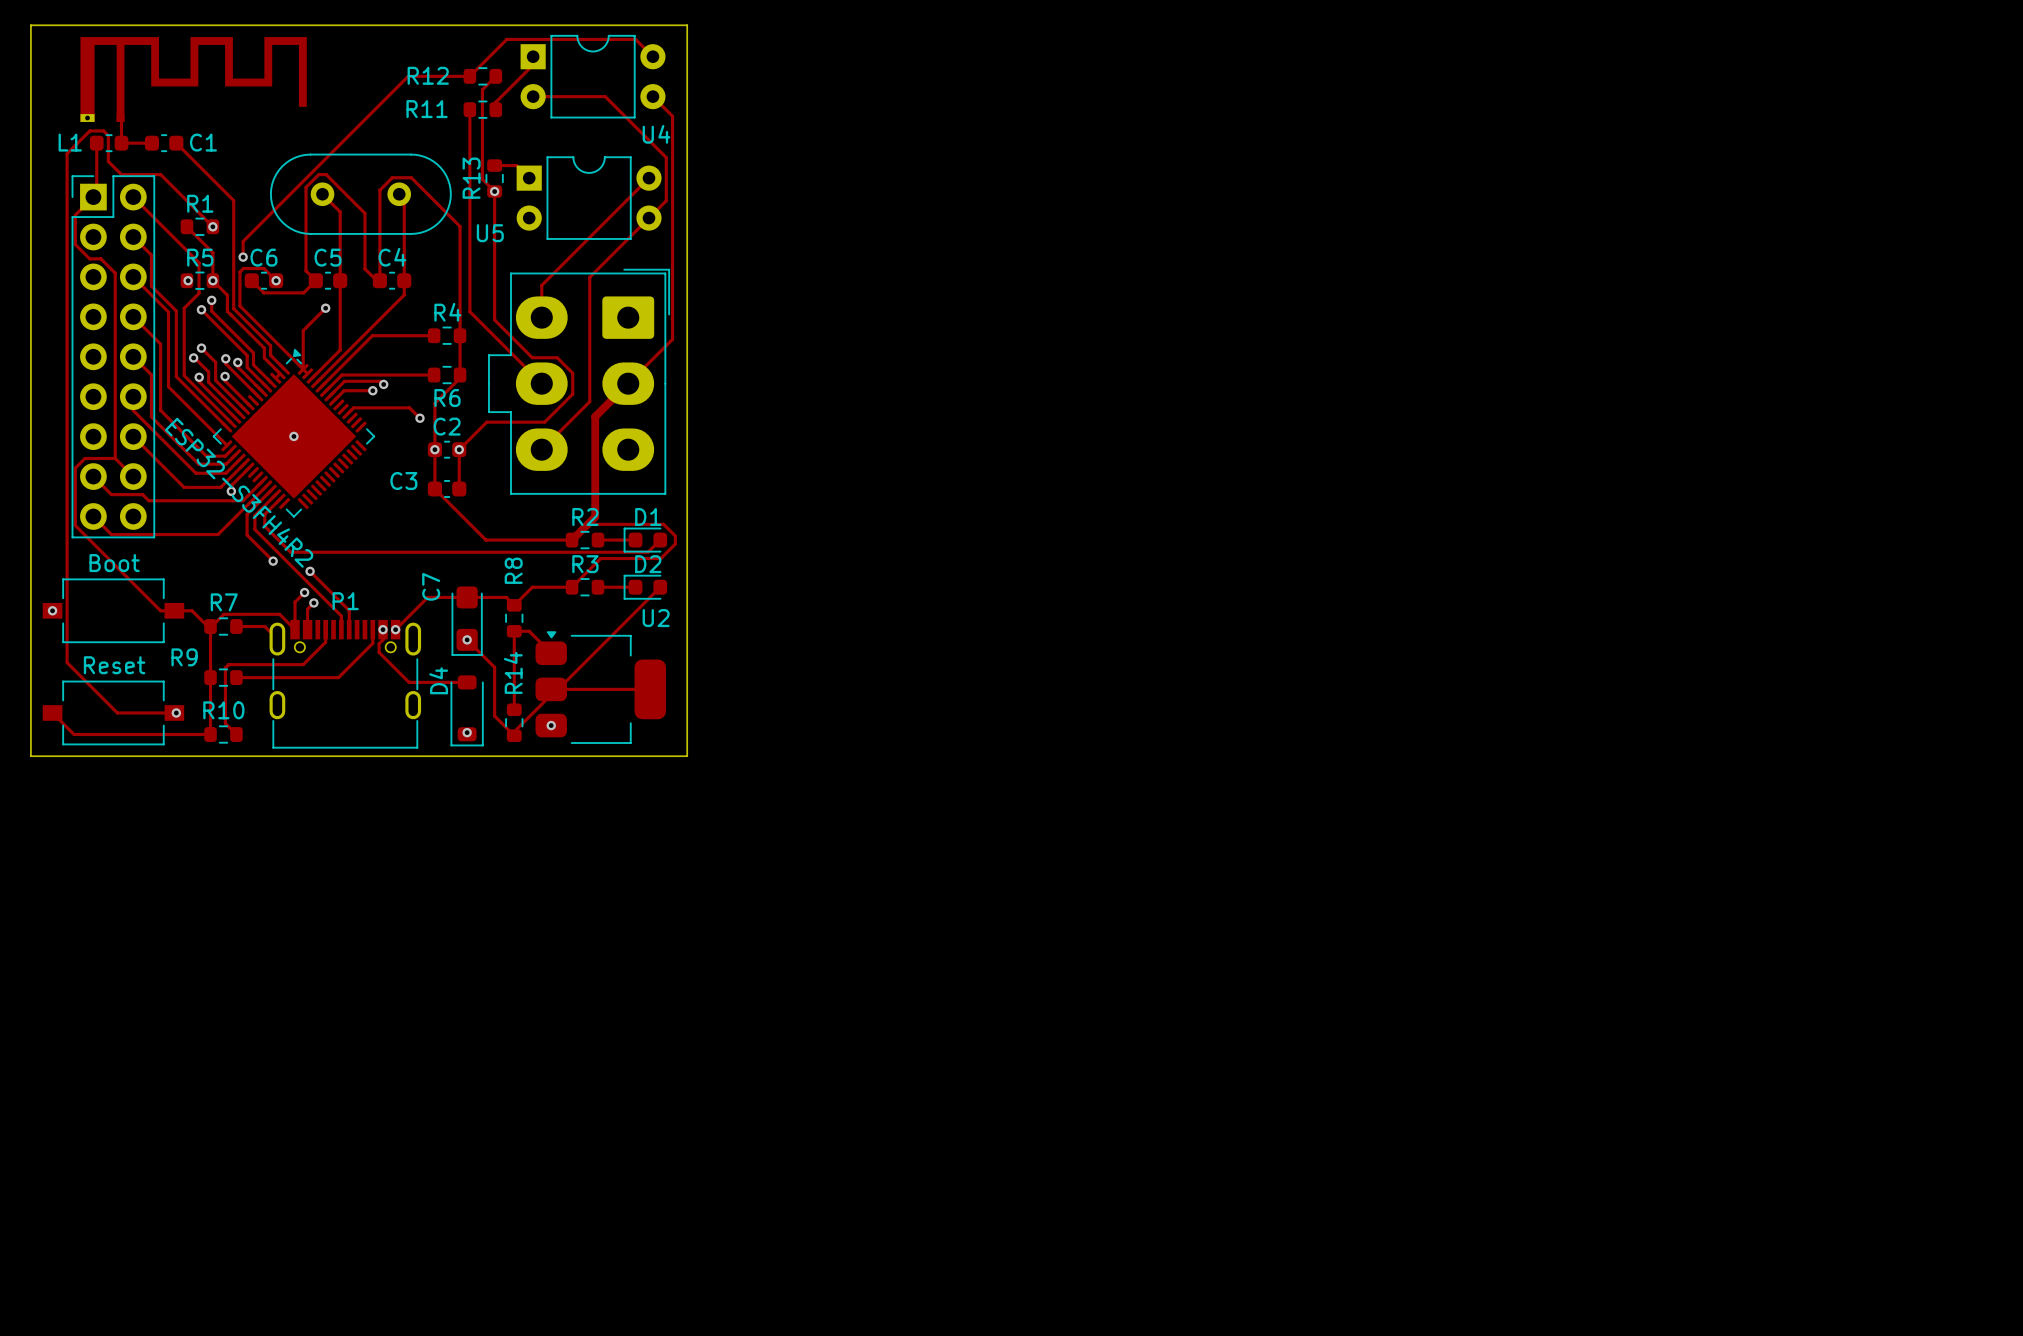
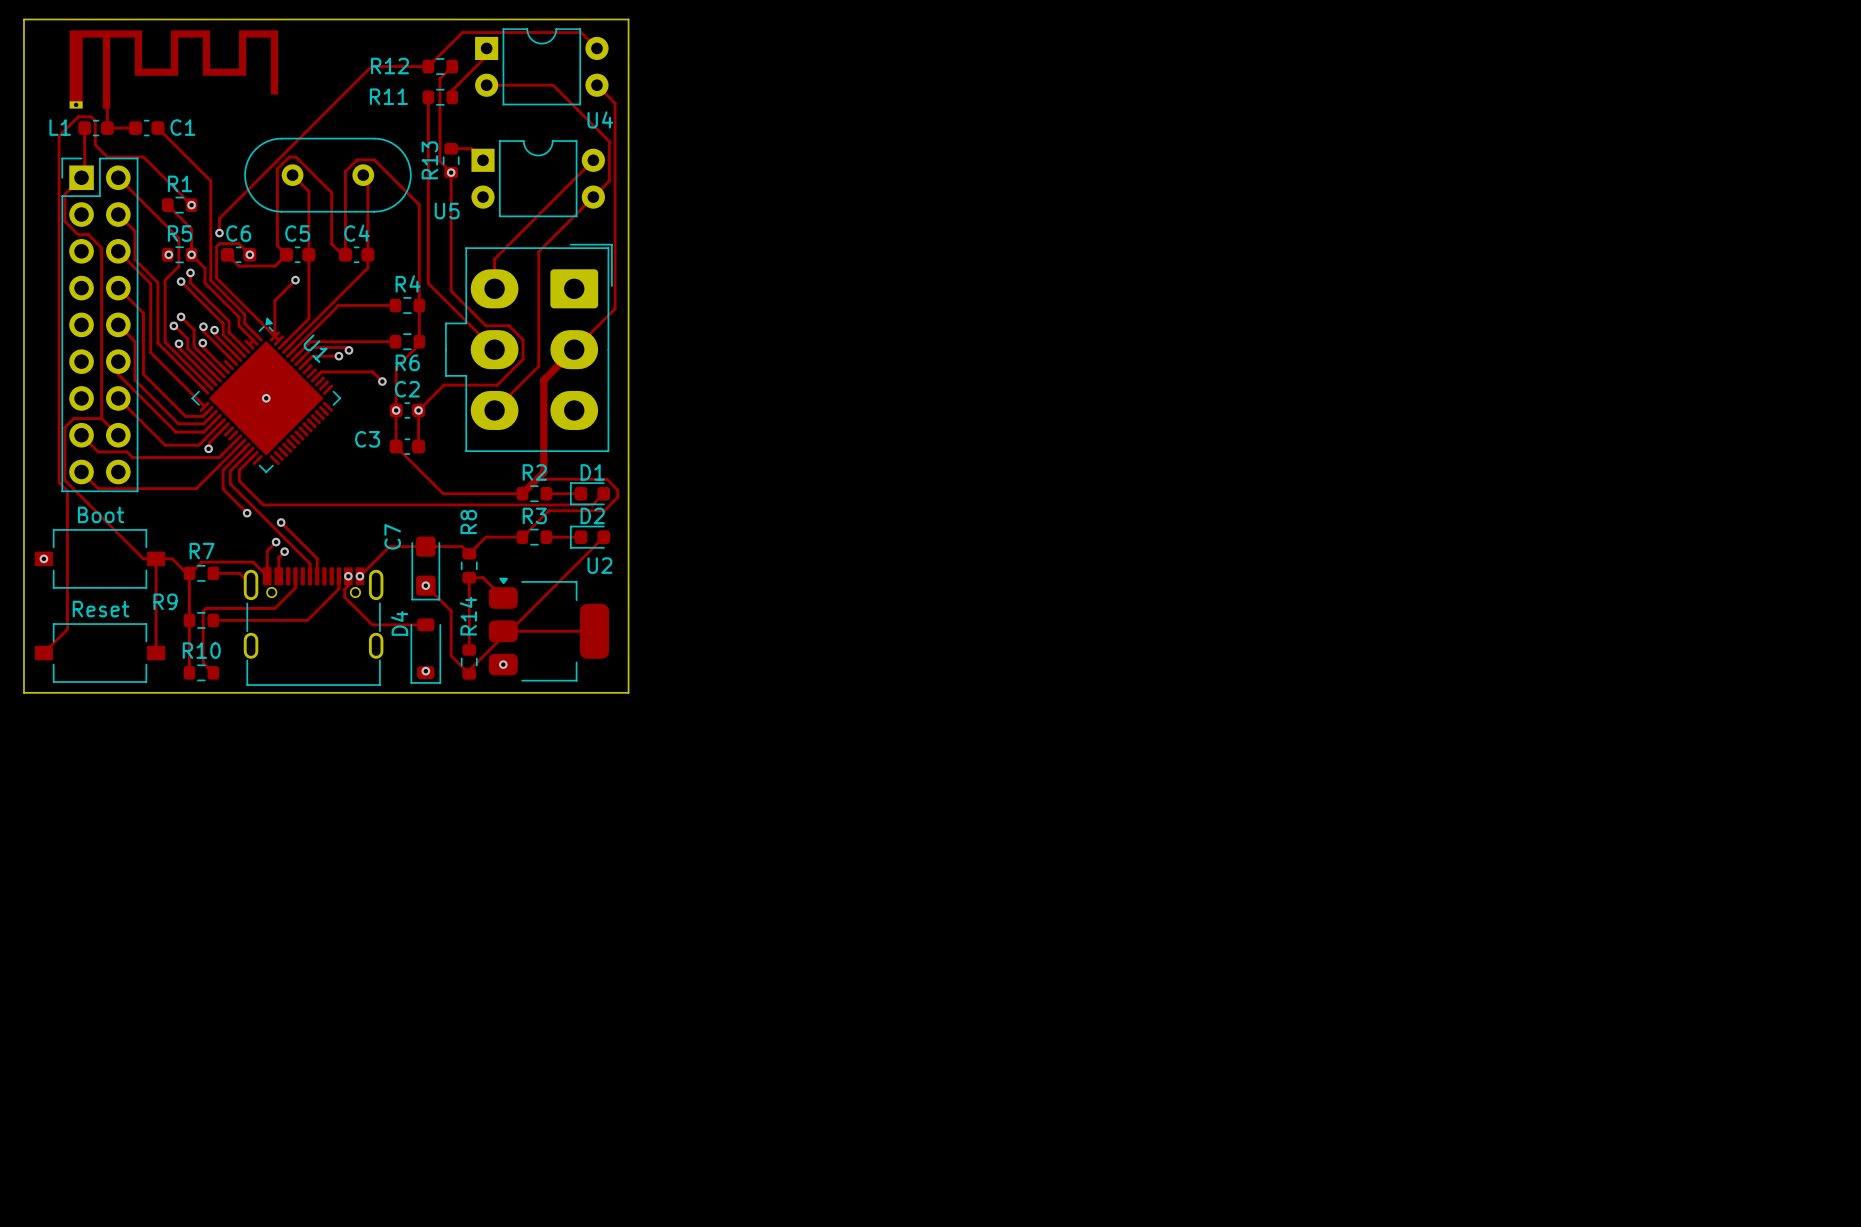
track: (69, 151) (67, 153) (67, 662) (117, 712) (176, 712) -> (59, 136) (59, 482) (67, 491) (67, 629) (43, 653)
ESP32-S3FH4R2 name: ESP32-S3FH4R2 (239, 492) -> U1 (315, 348)
P1 name: P1 (345, 601) -> none
track: none -> (156, 558) (156, 653)
track: (52, 712) (74, 734) (210, 734) -> none
via: (176, 712) -> none

